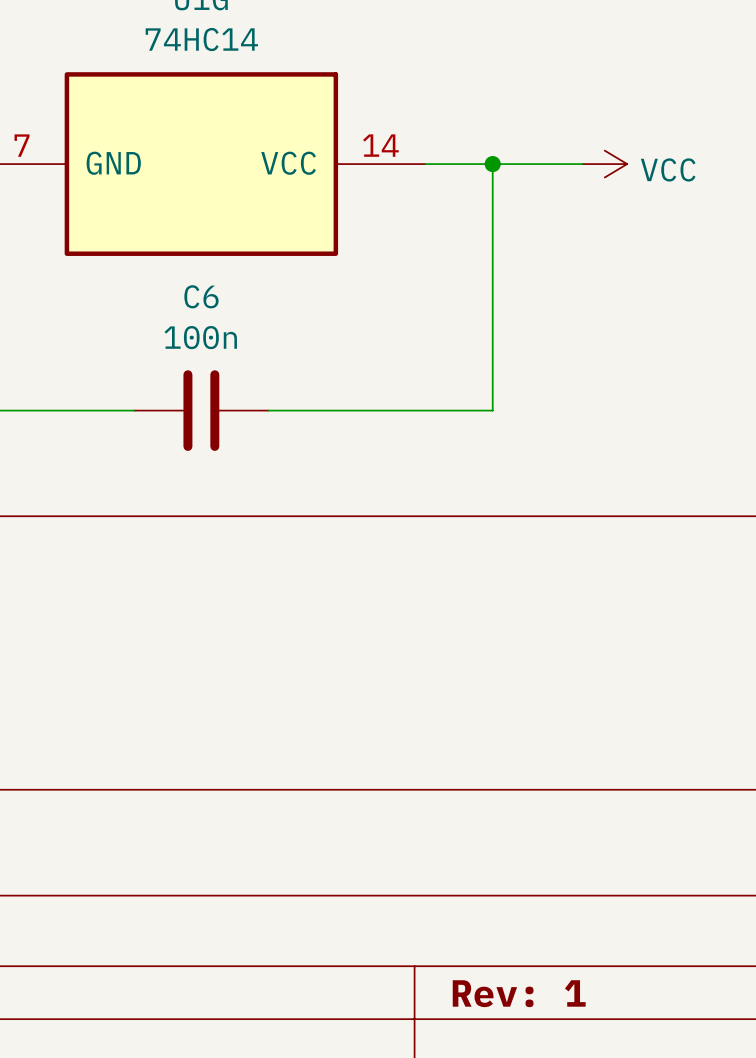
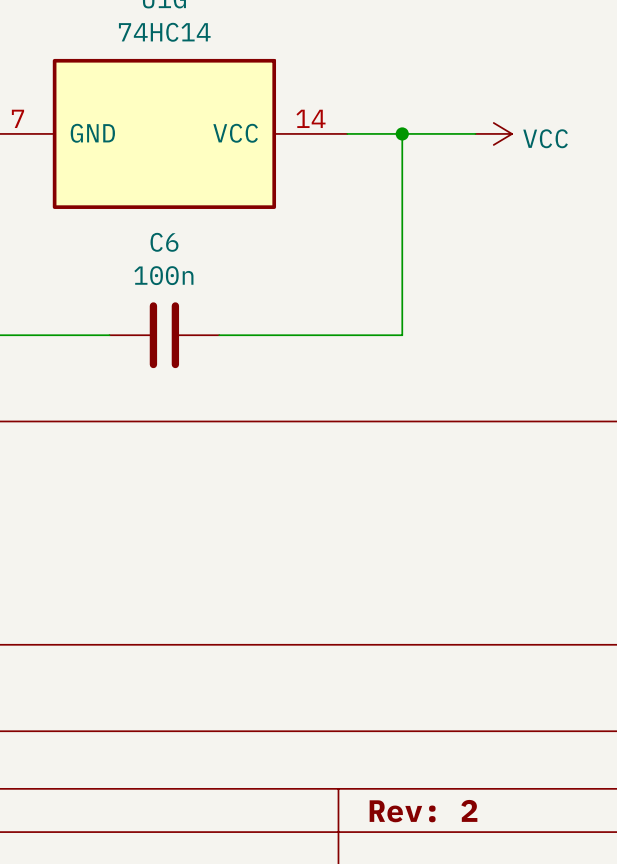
title block: Rev: 1 (519, 993) -> Rev: 2 (423, 811)

